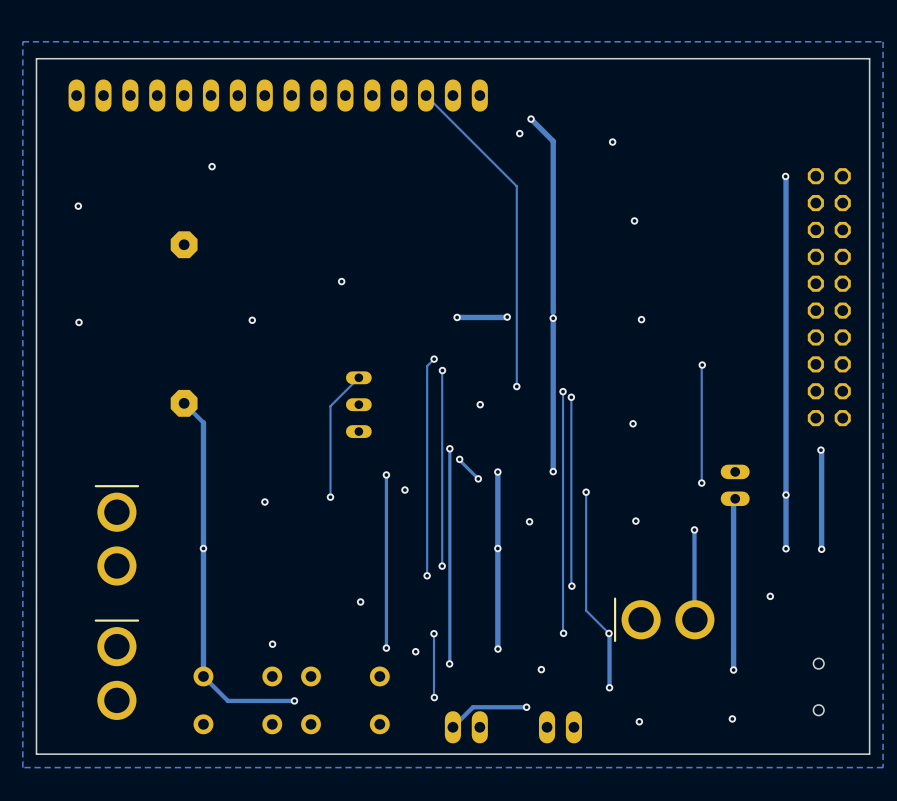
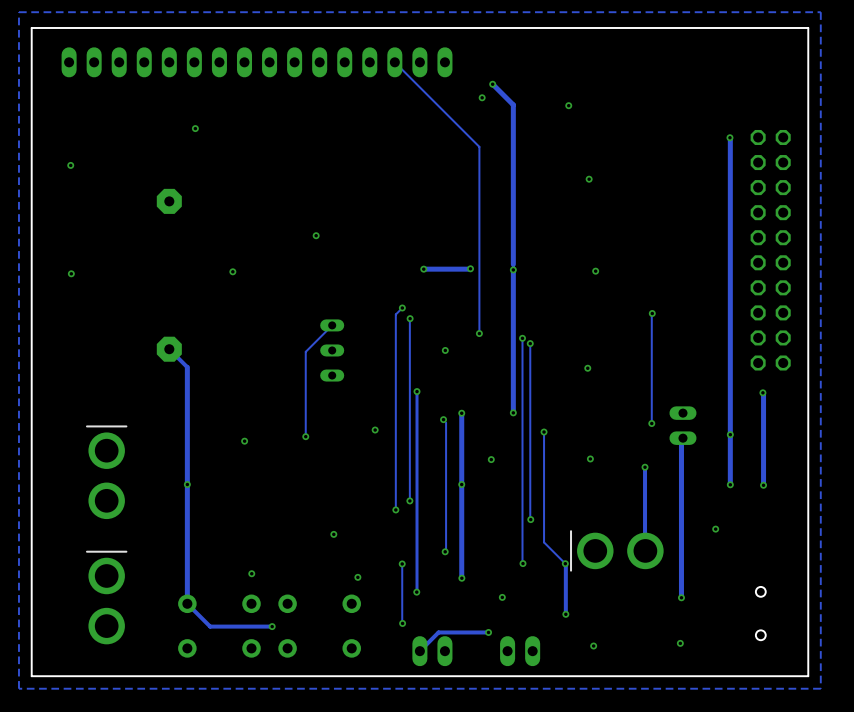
track: (459, 459) (478, 478) -> none
via: (459, 459) -> none
track: (386, 474) (386, 648) -> none
via: (386, 474) -> none
track: none -> (446, 422) (445, 551)
via: none -> (445, 551)
via: (415, 651) -> none

